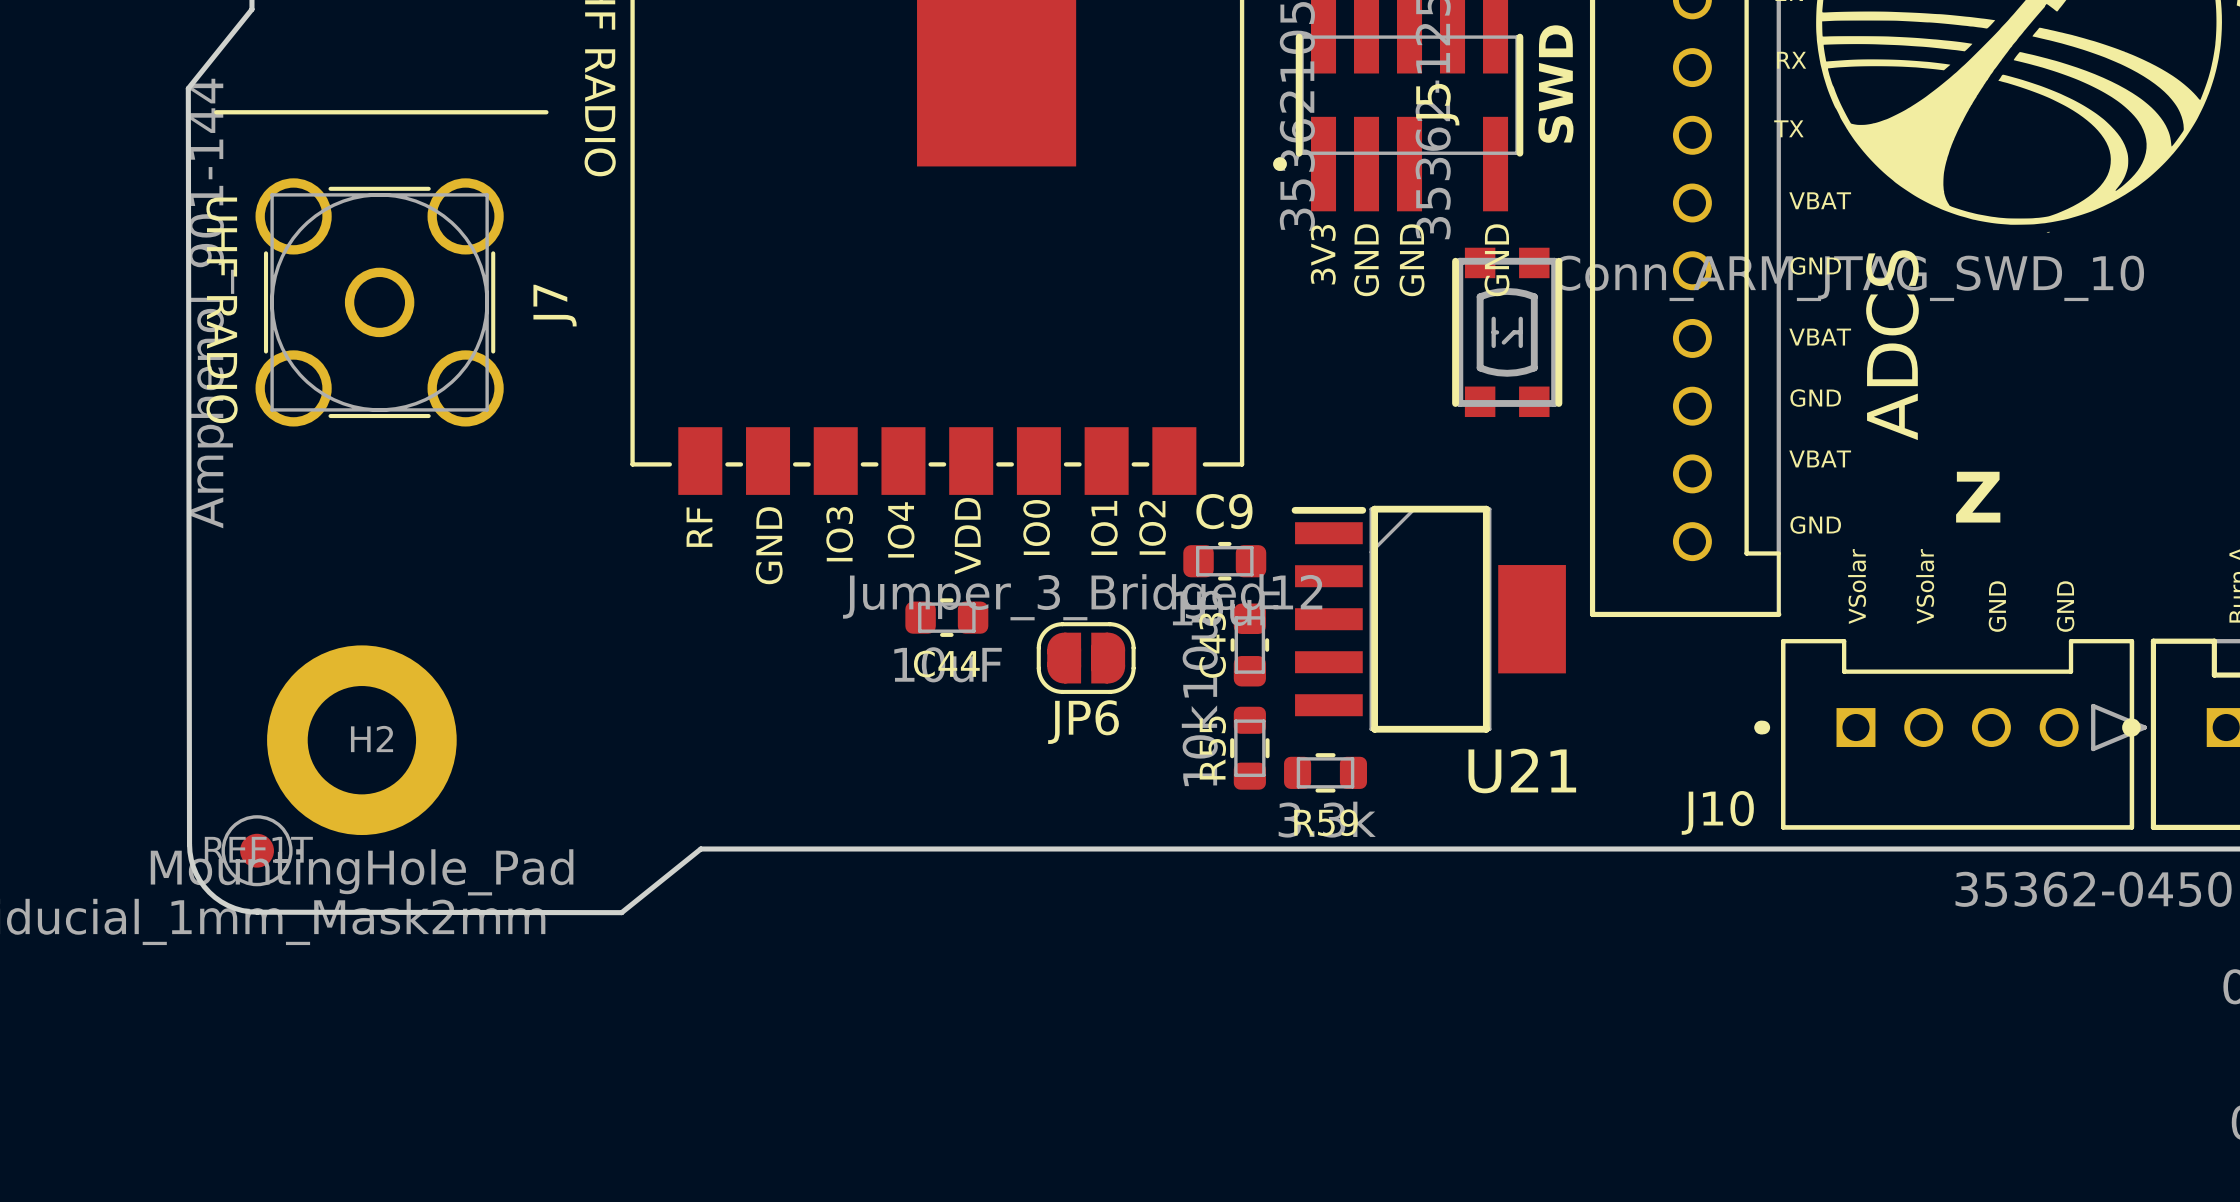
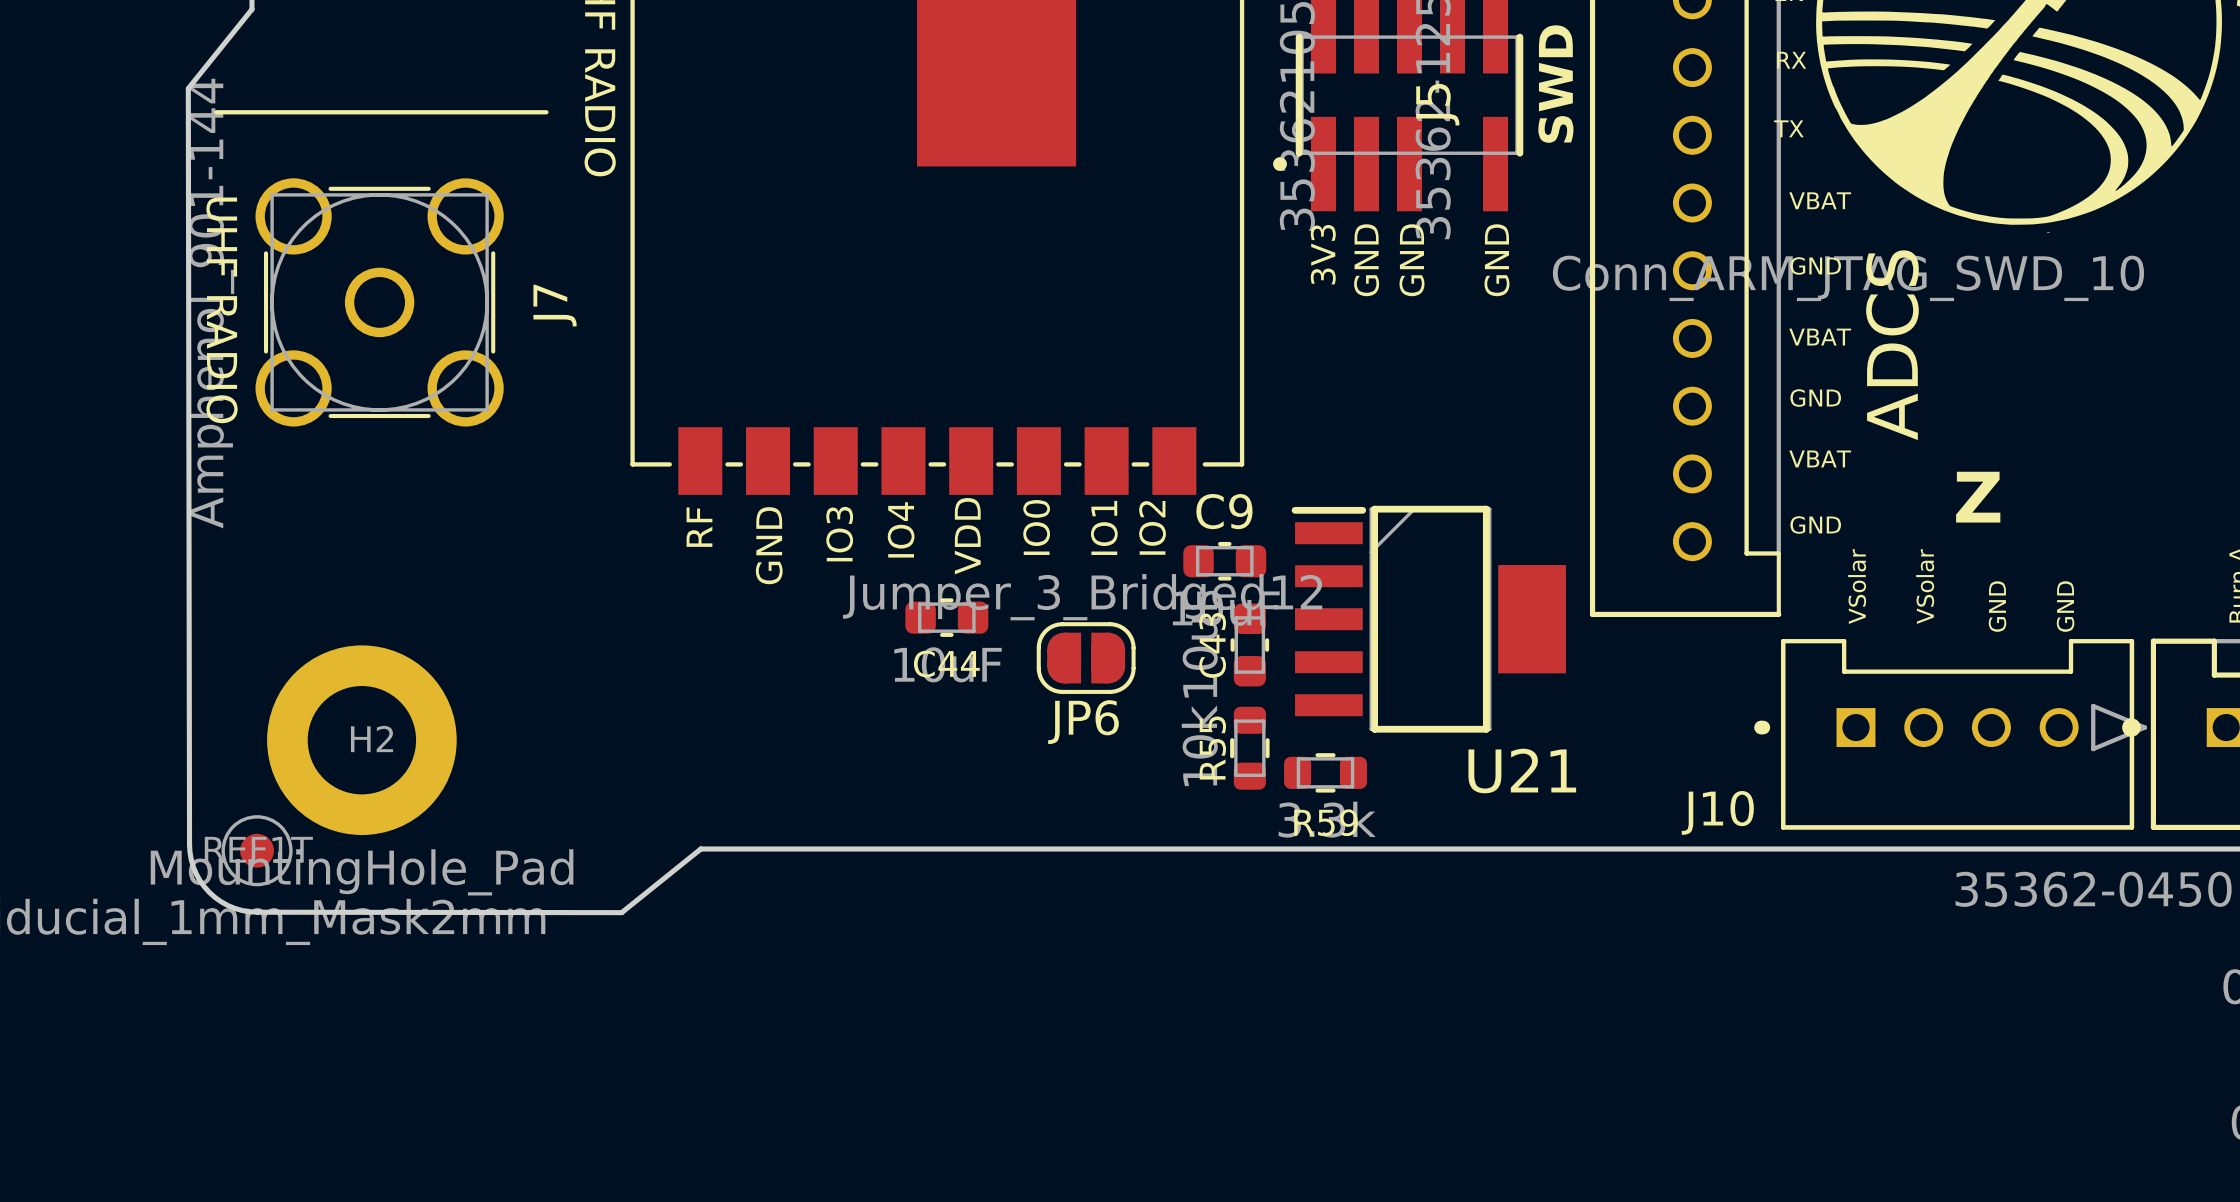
part: (1507, 332) -> none

